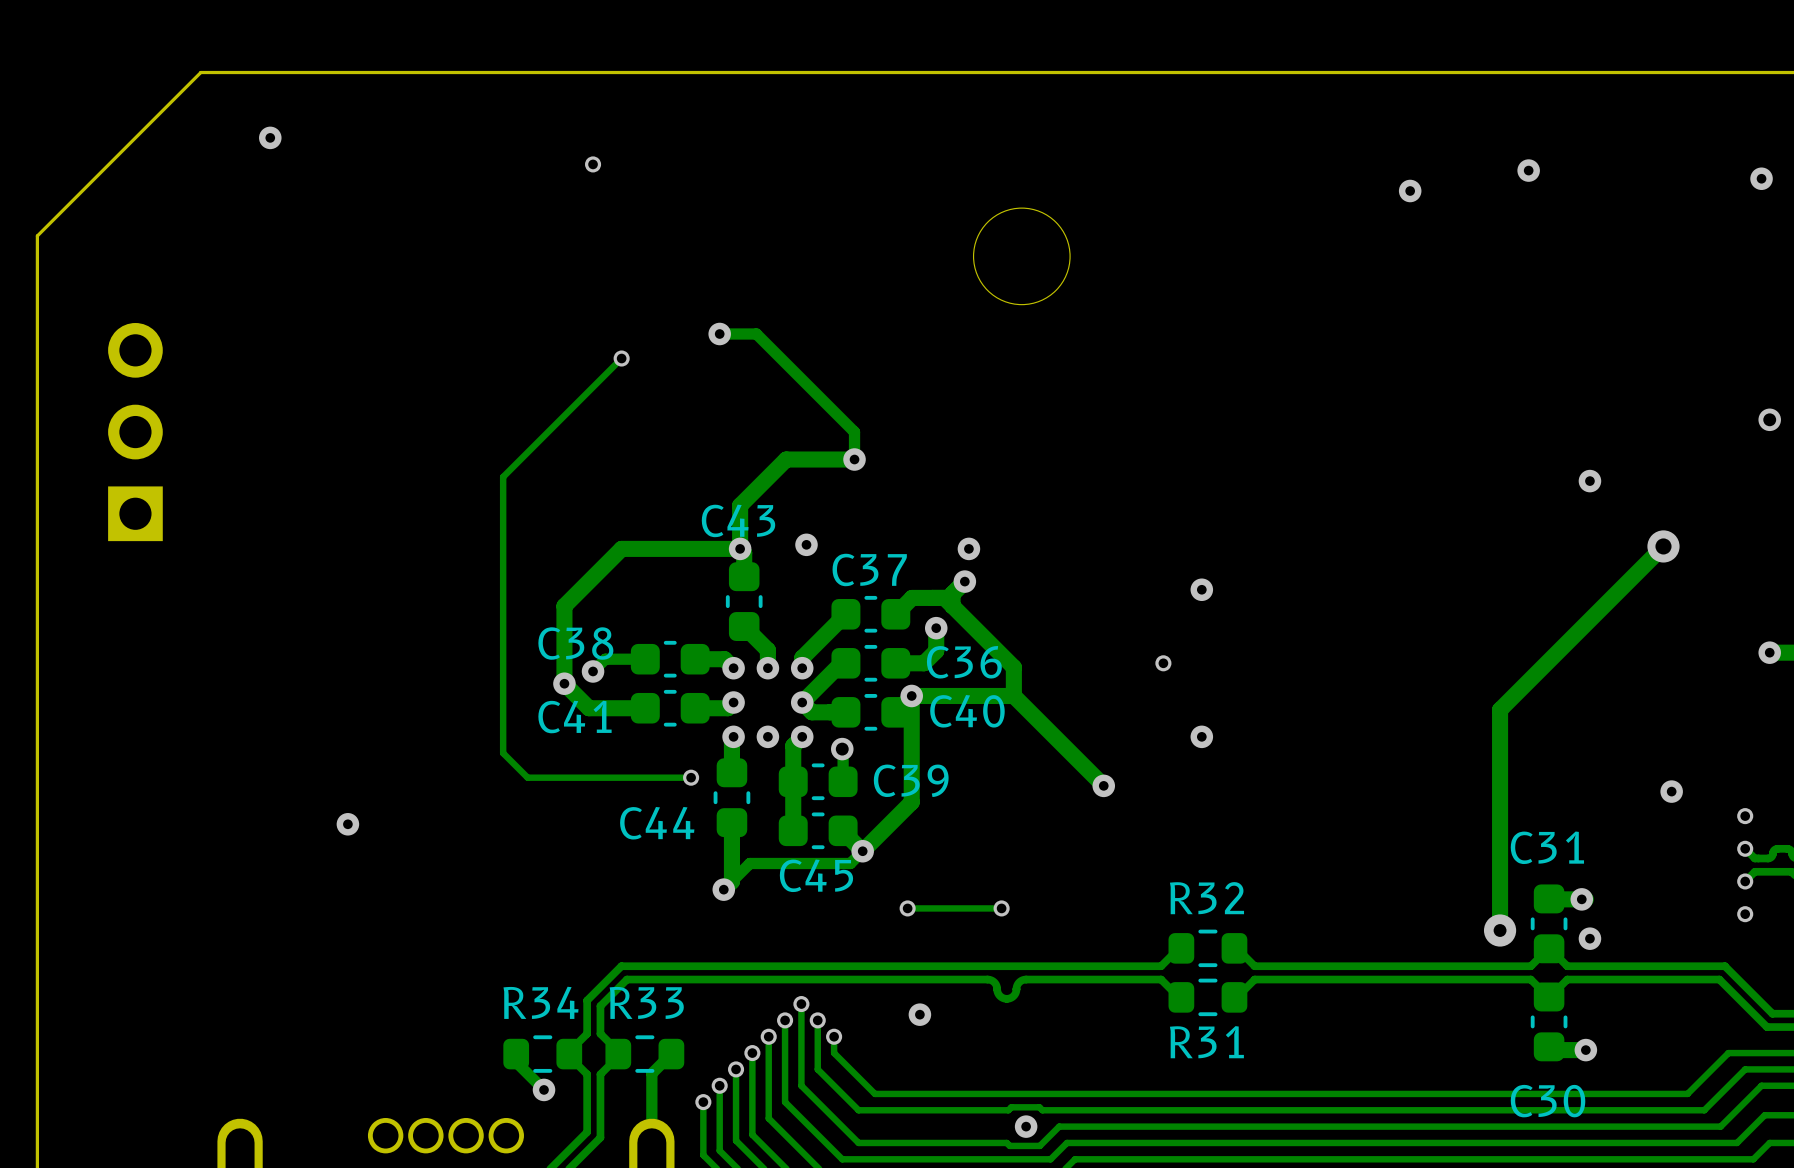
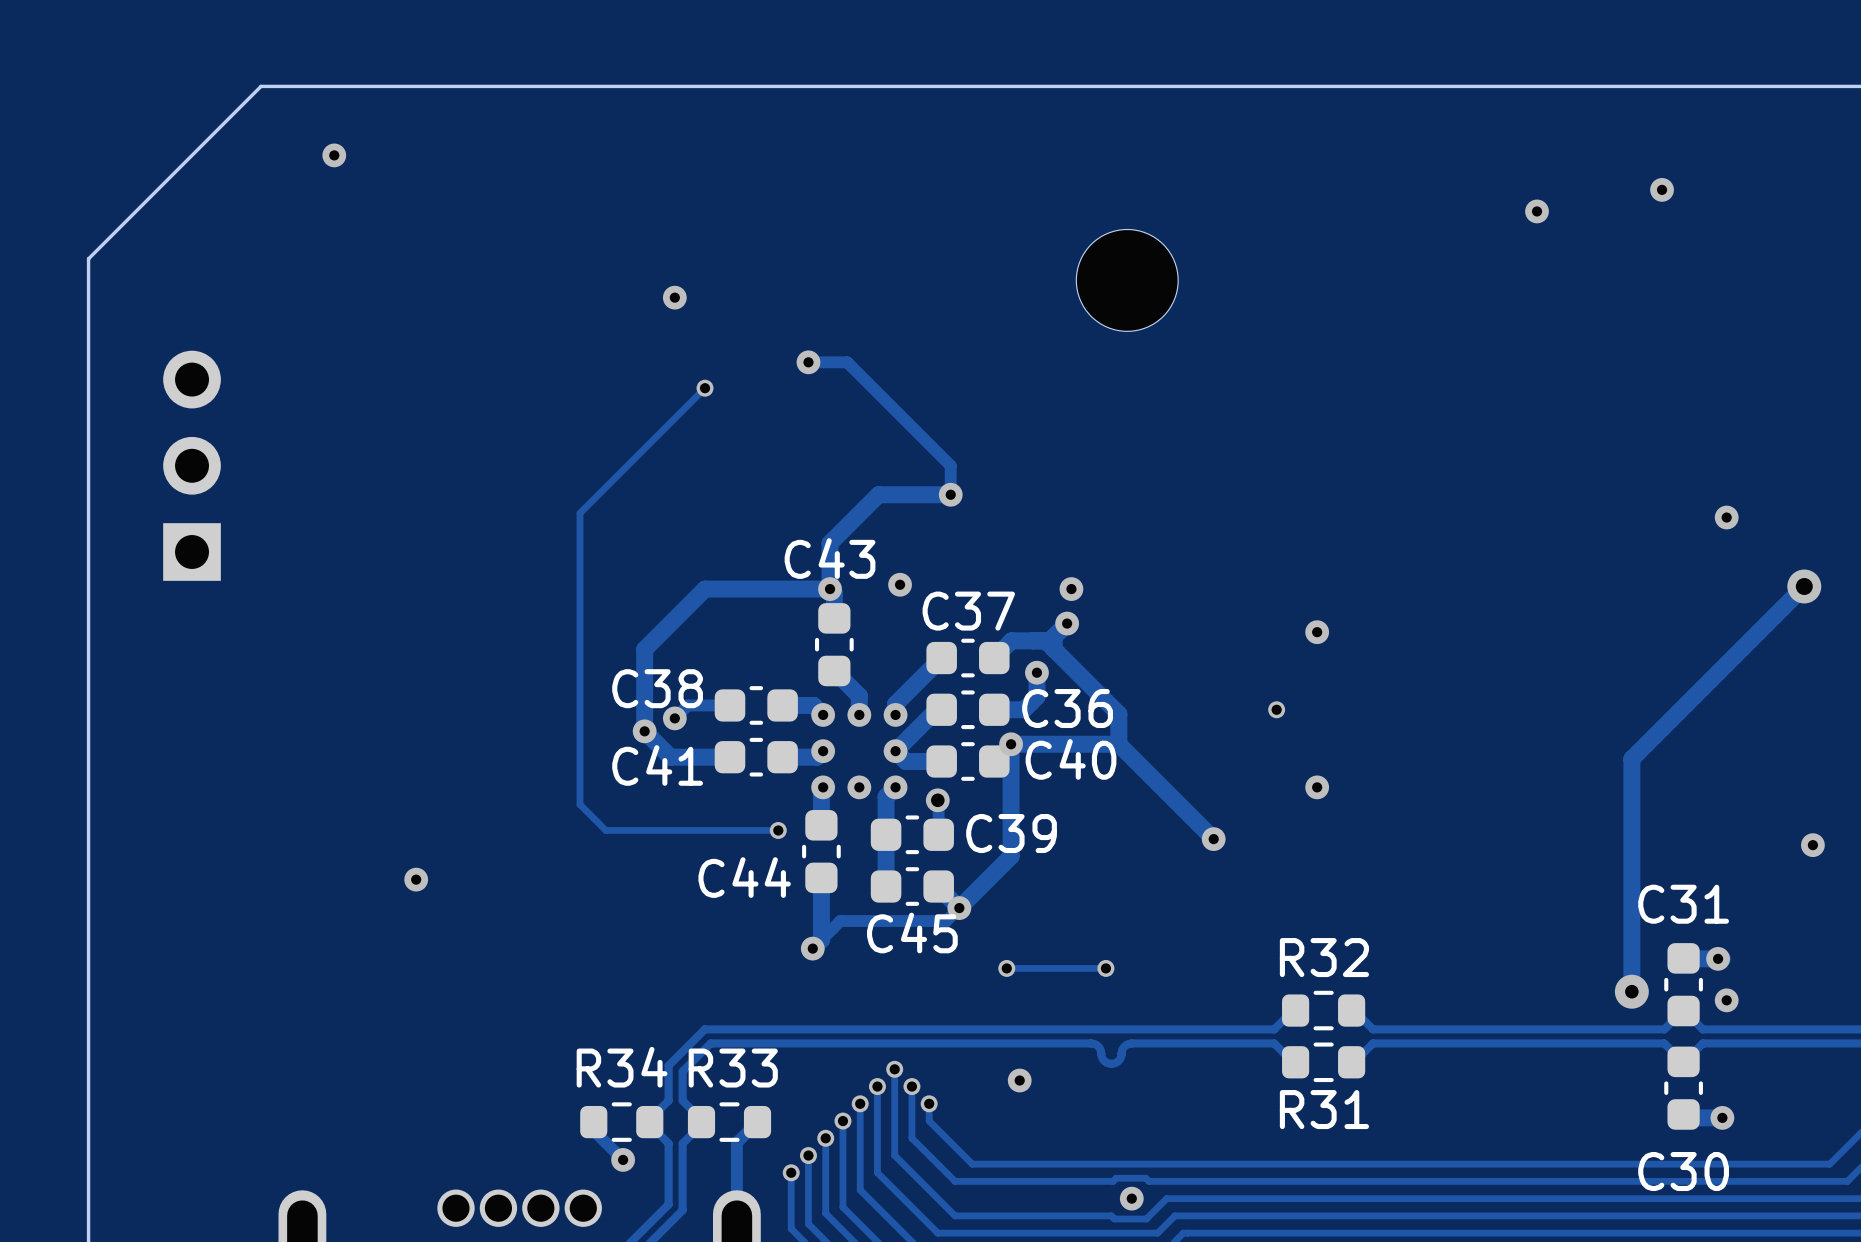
via: (593, 164) -> none
via: none -> (674, 297)

